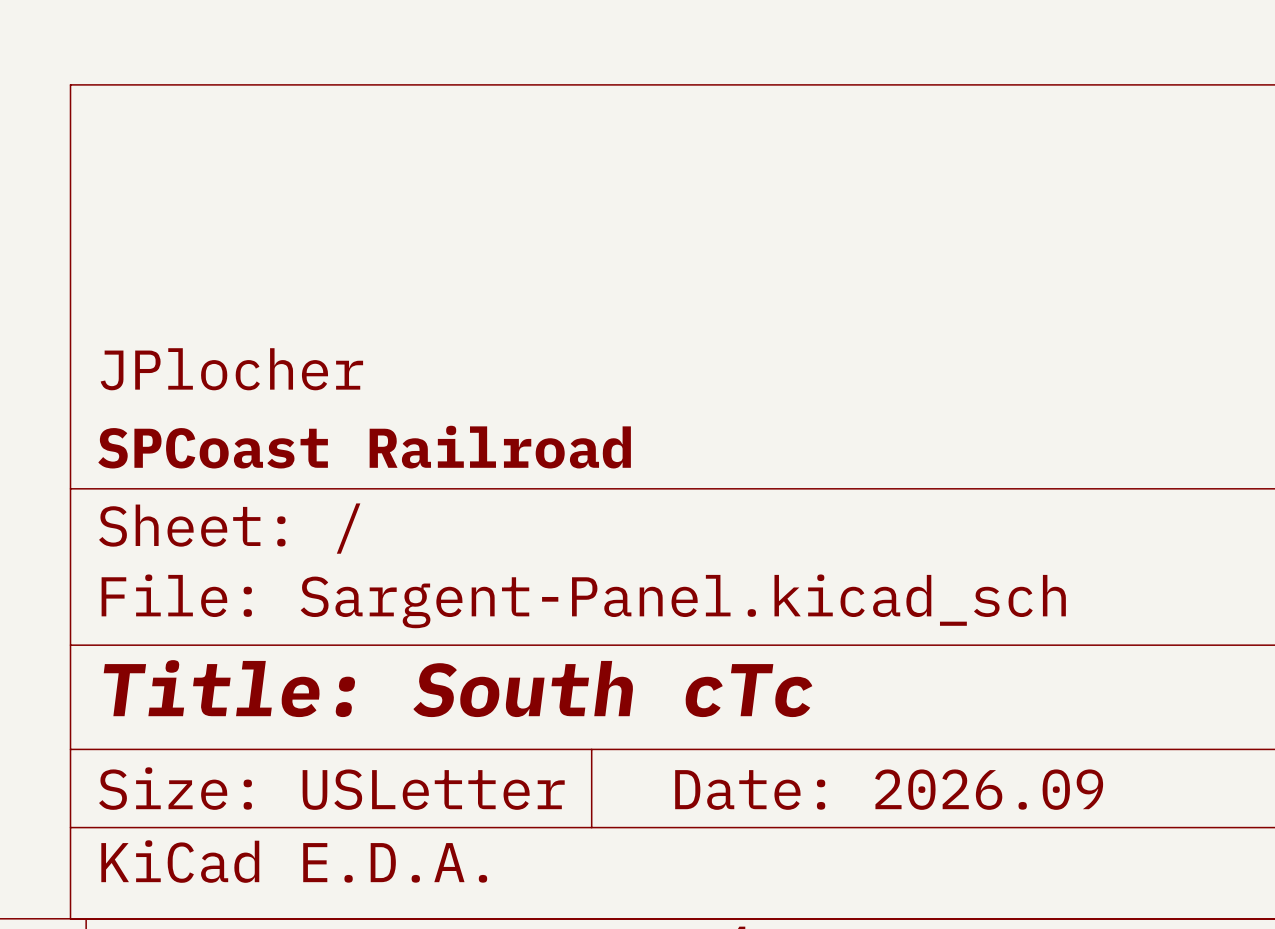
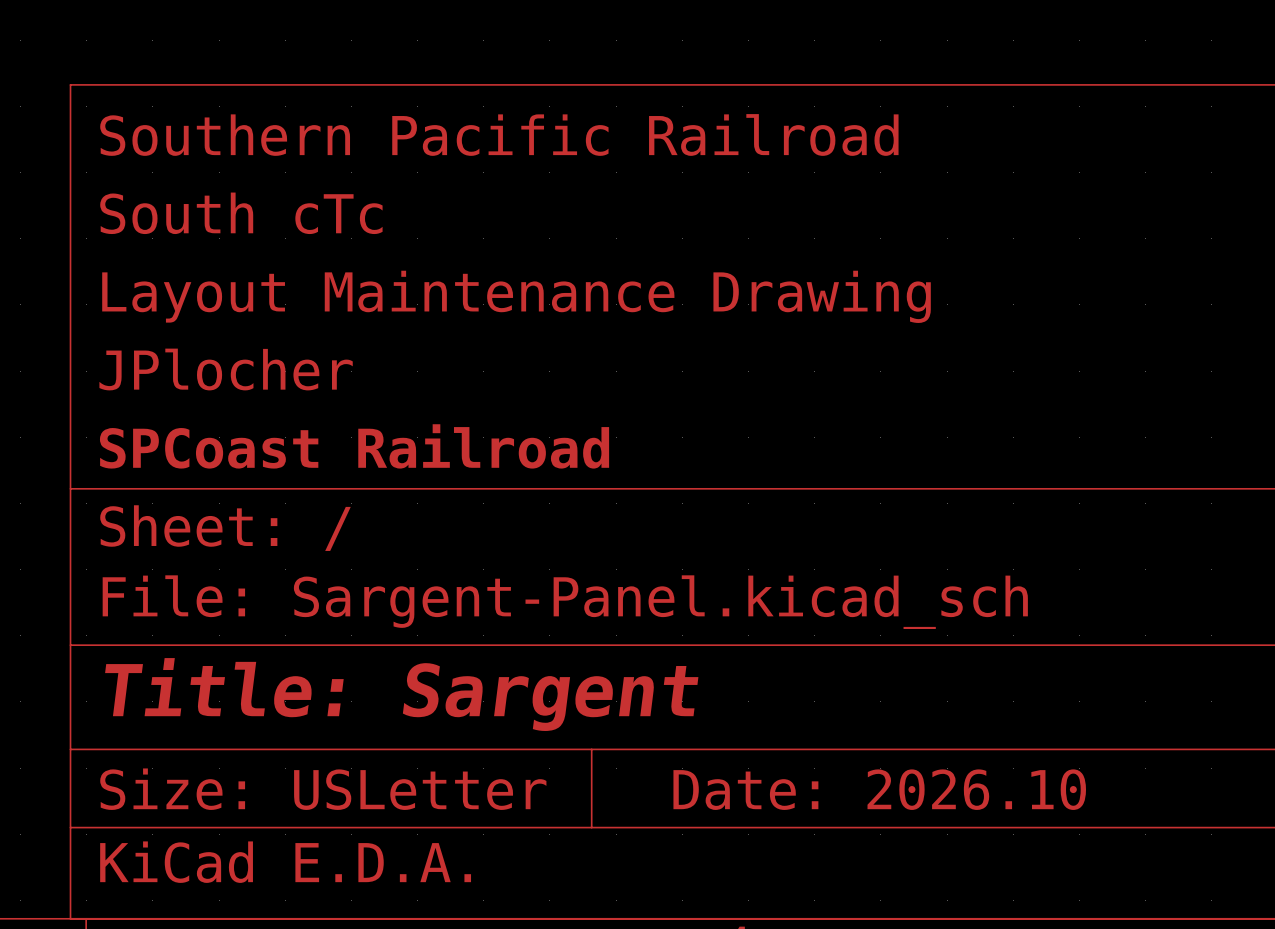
title block: none -> Southern Pacific Railroad (499, 134)
title block: none -> South cTc (241, 213)
title block: none -> Layout Maintenance Drawing (516, 296)
title block: Title: South cTc (458, 688) -> Title: Sargent (401, 694)
title block: Date: 2026.09 (889, 789) -> Date: 2026.10 (879, 789)

